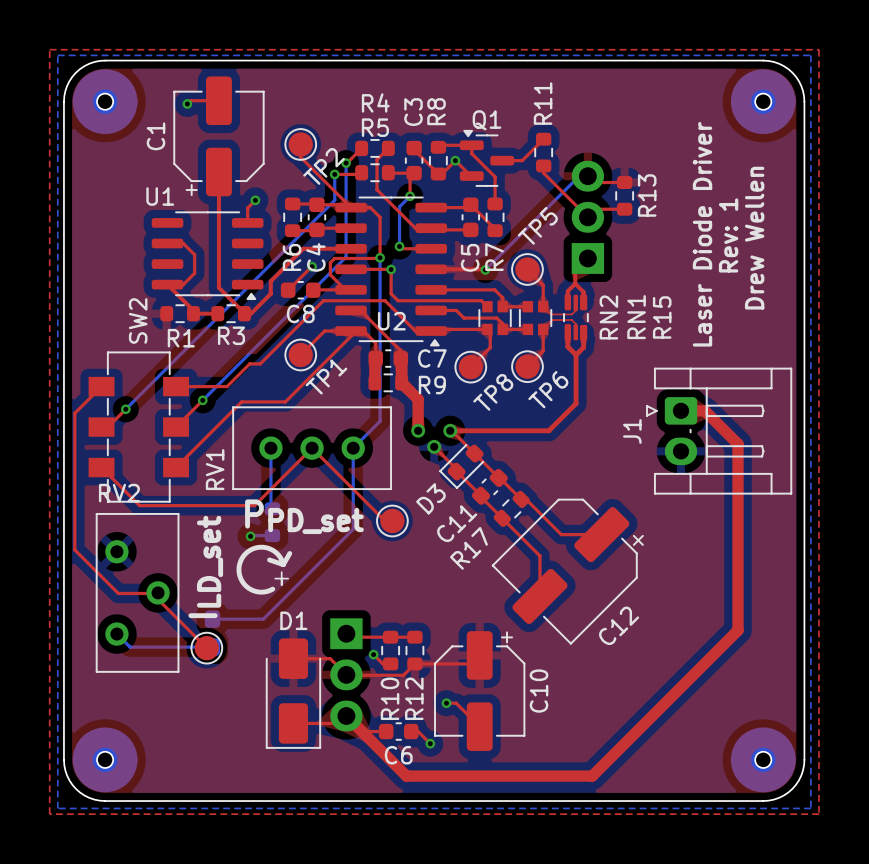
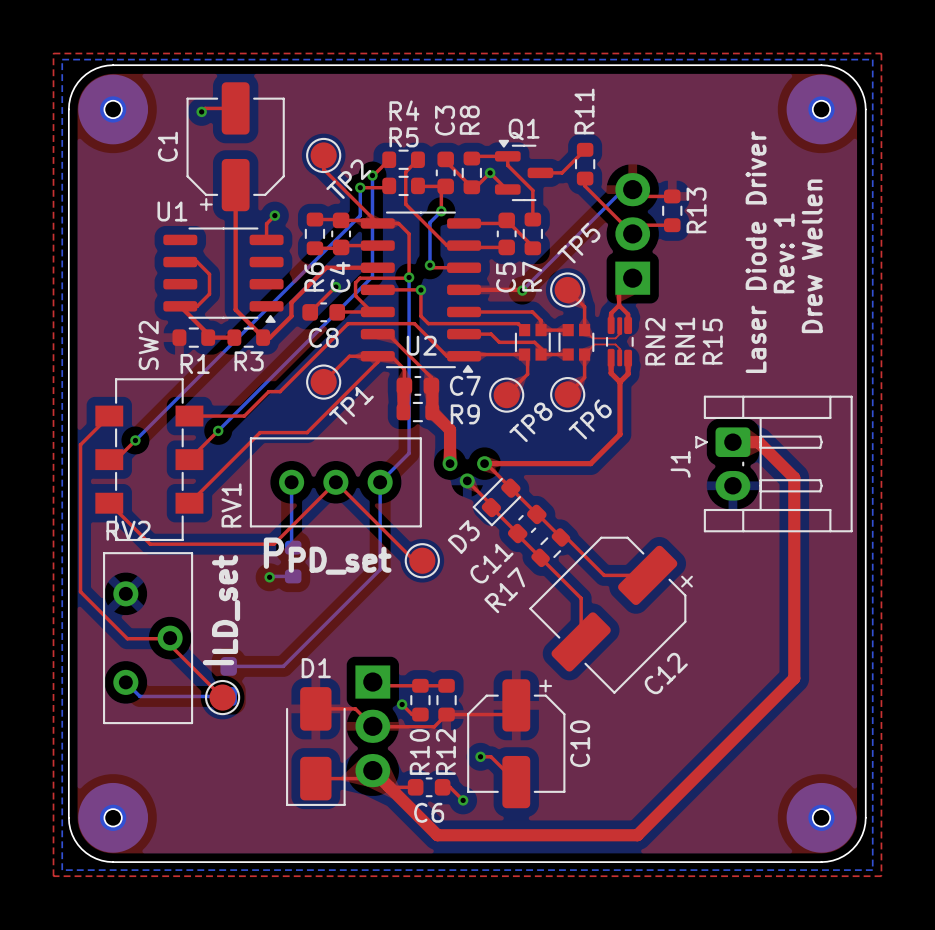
line: (289, 553) (283, 564) -> none
line: (283, 564) (269, 559) (283, 564) -> none
line: (283, 564) (276, 552) (263, 547) (249, 550) (240, 560) (239, 574) (246, 586) (259, 592) (272, 589) -> none
line: (281, 572) (281, 585) -> none
line: (275, 578) (288, 578) -> none

